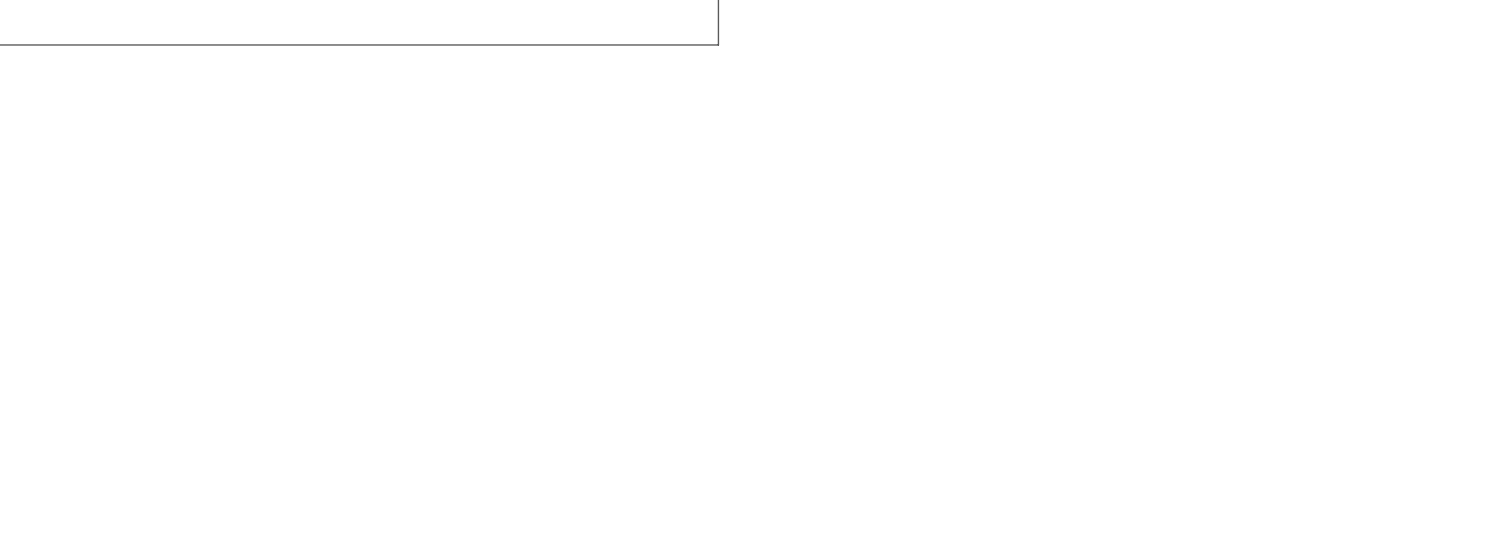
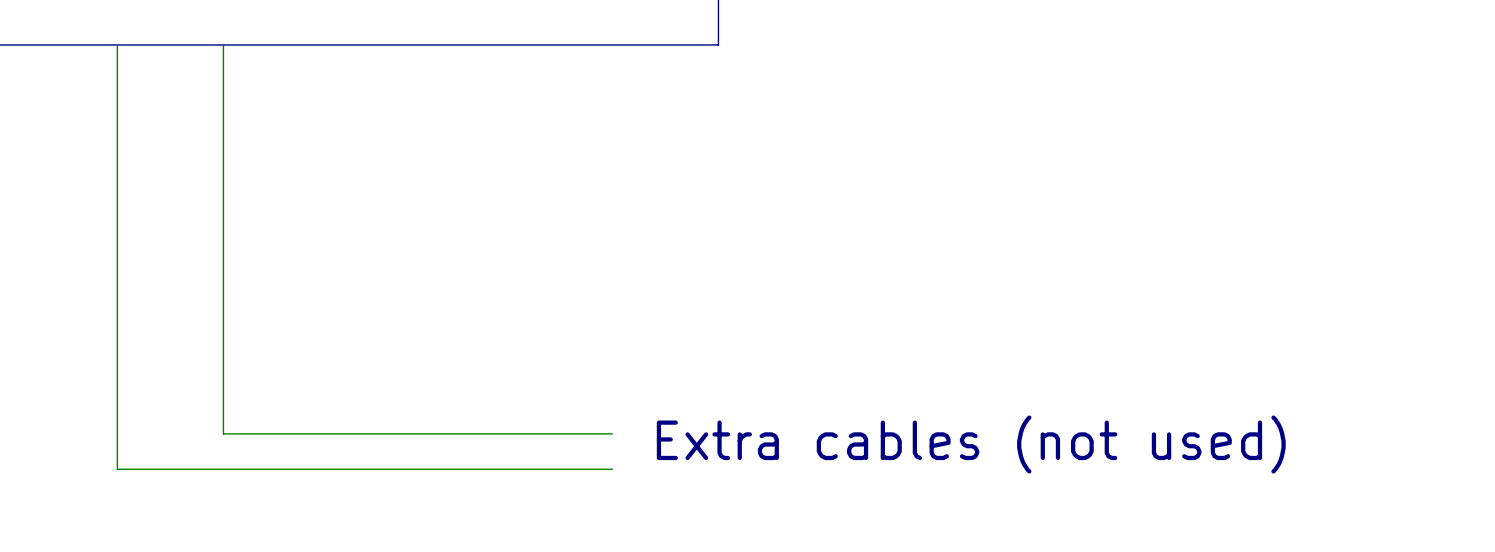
wire: none -> (117, 44) (117, 469) (612, 469)
wire: none -> (223, 44) (223, 433) (612, 433)
text: none -> Extra cables (not used) (971, 444)

